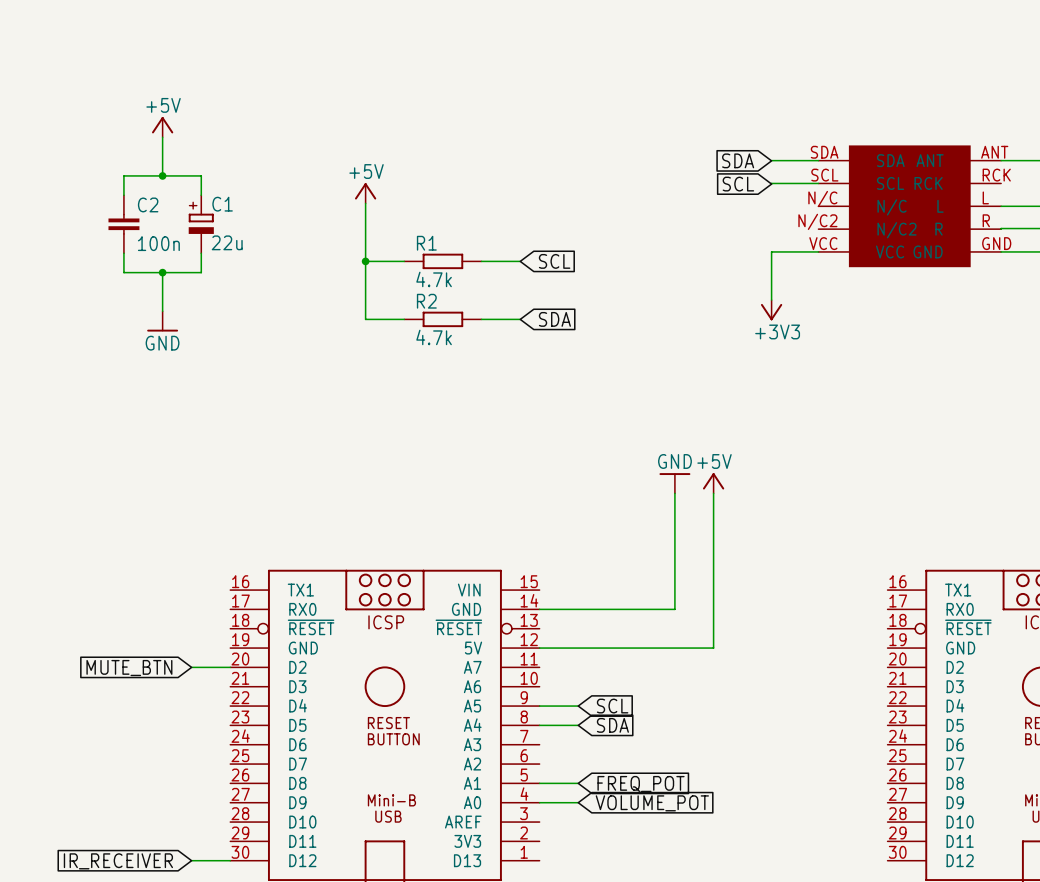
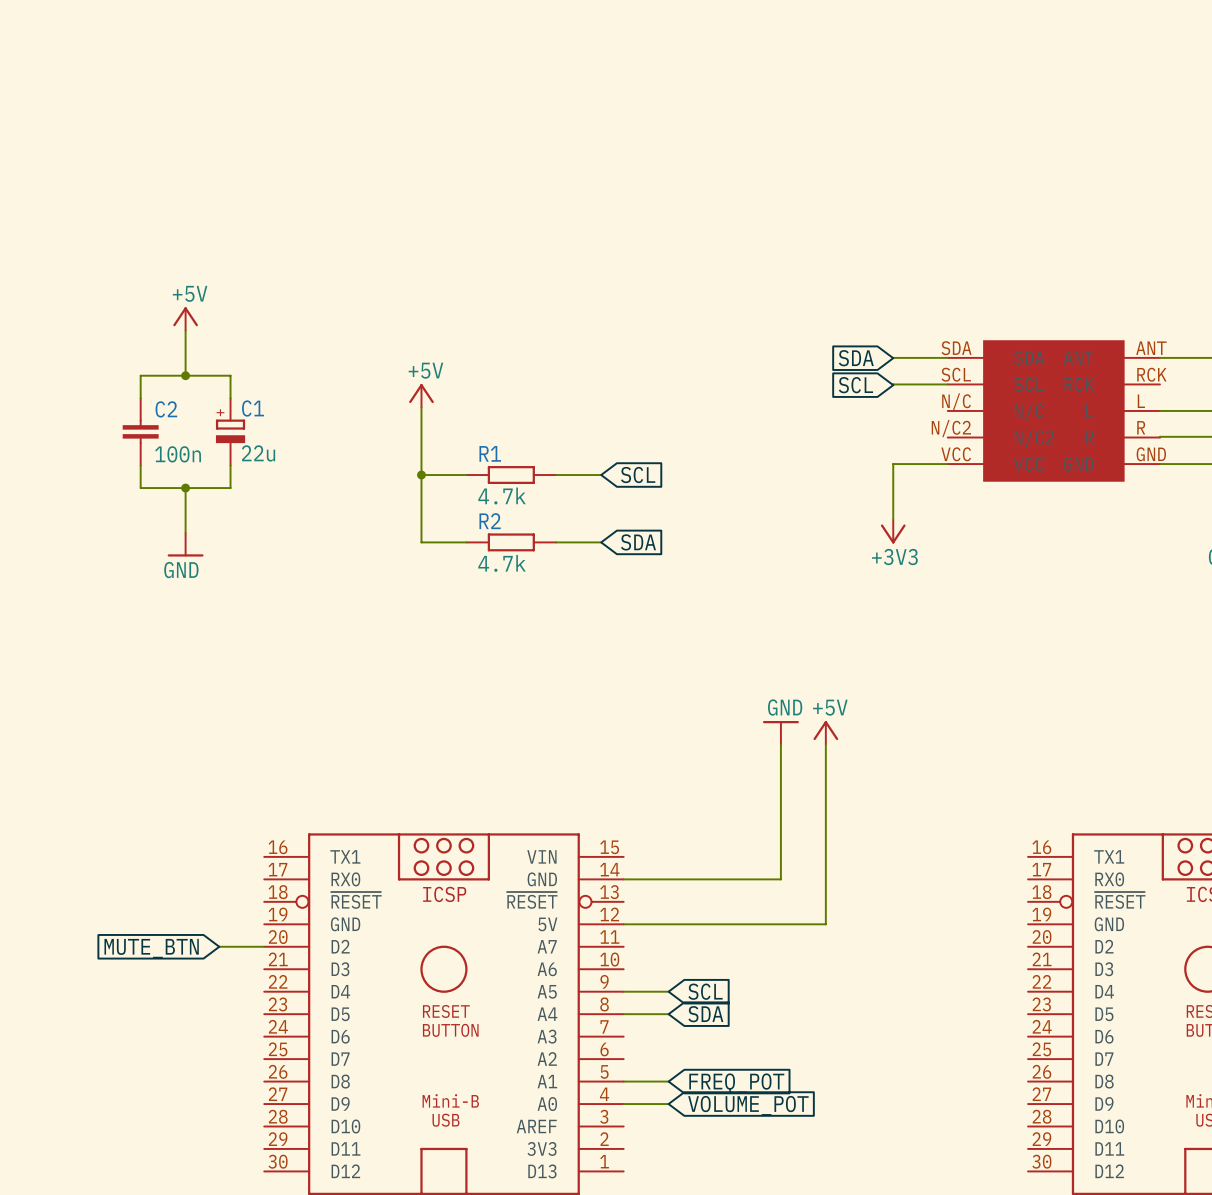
wire: (191, 860) (230, 860) -> none
global label: IR_RECEIVER (118, 861) -> none

